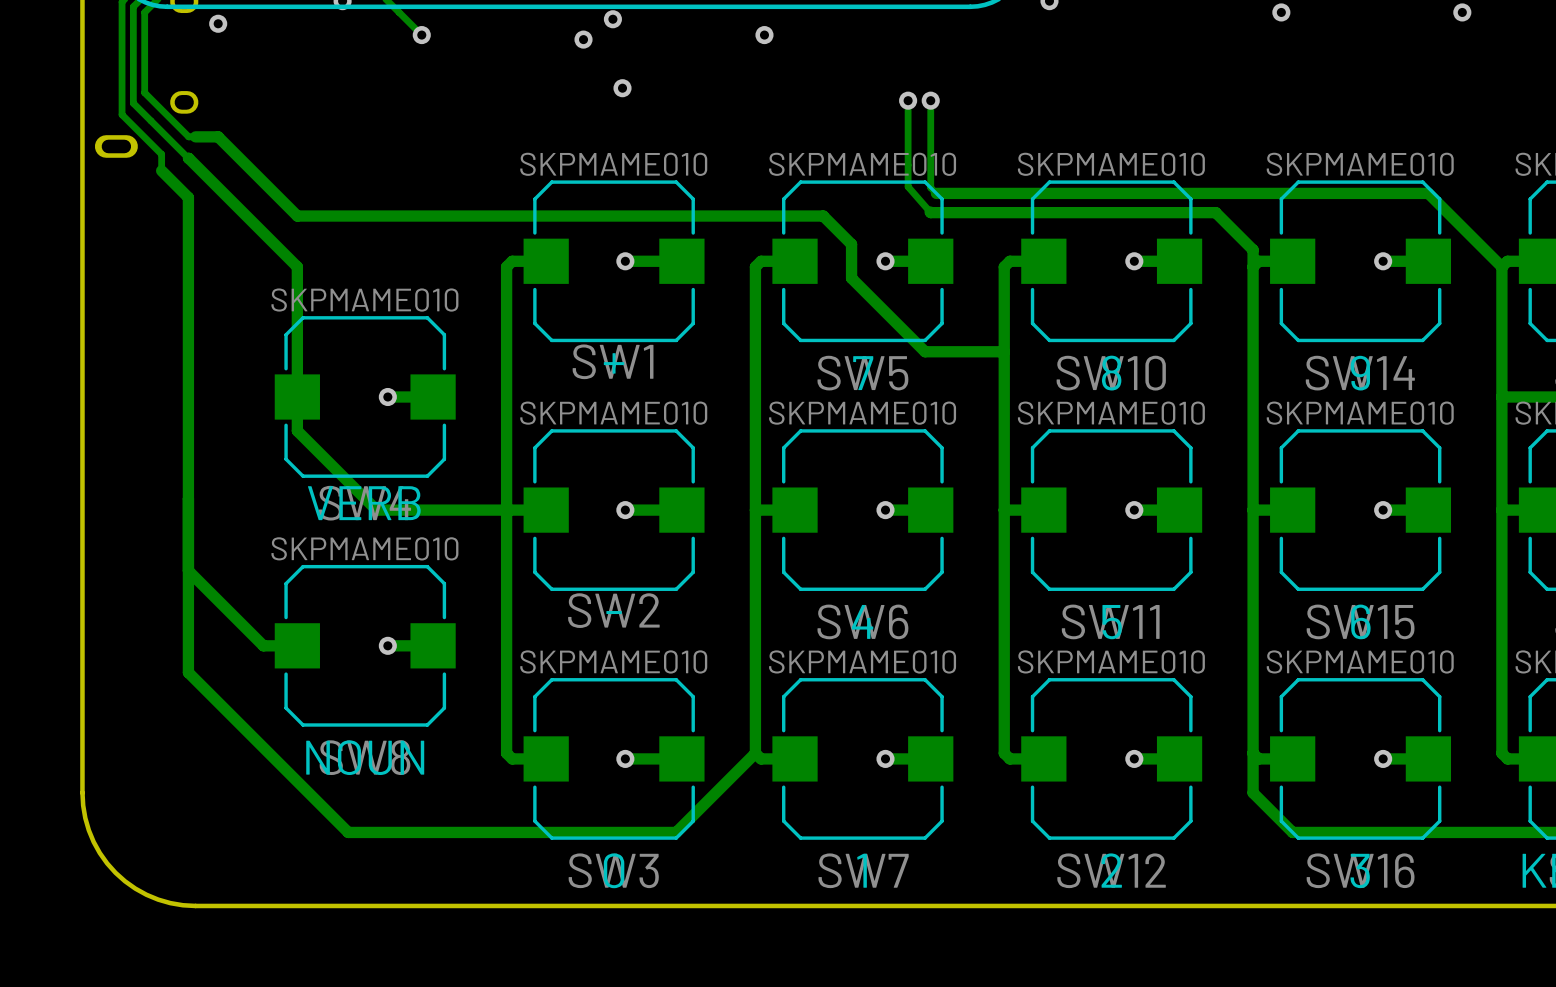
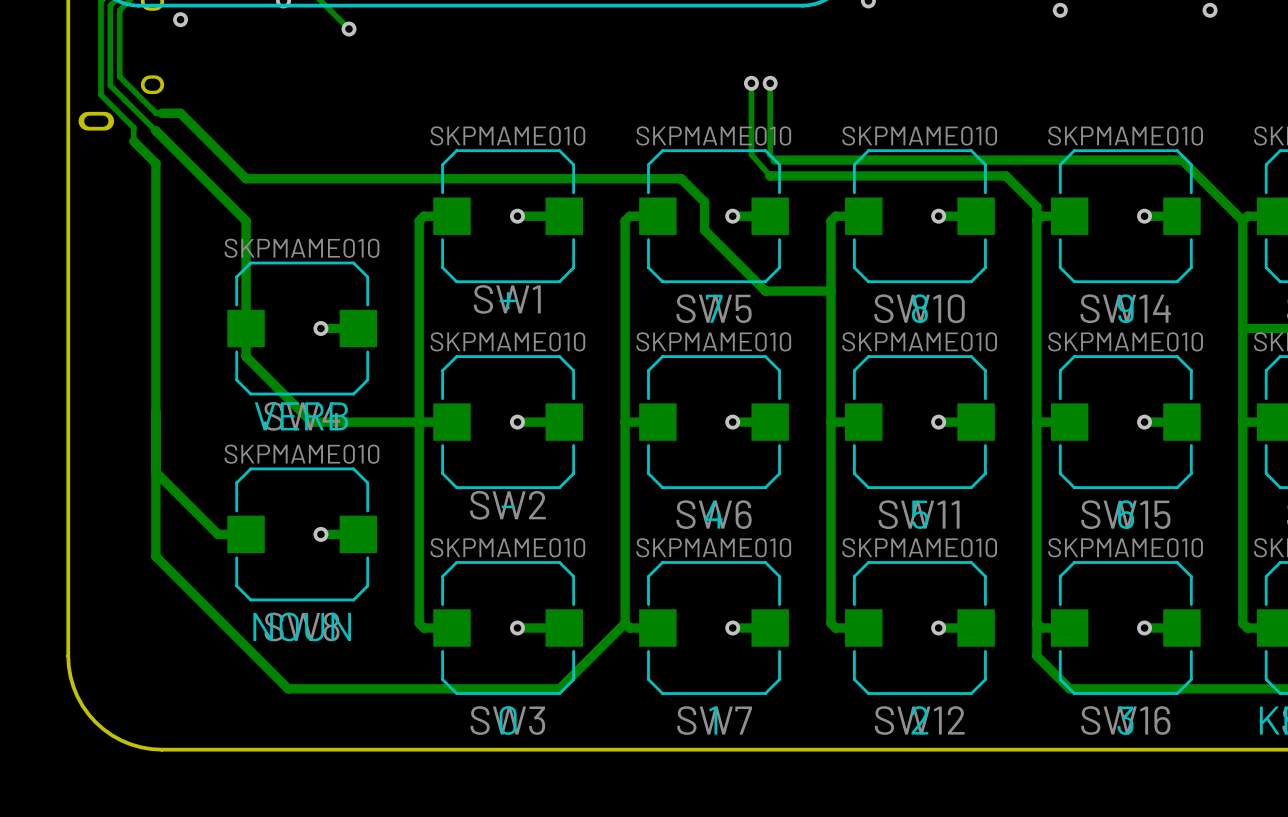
via: (612, 19) -> none
via: (764, 35) -> none
via: (583, 39) -> none
via: (622, 88) -> none

